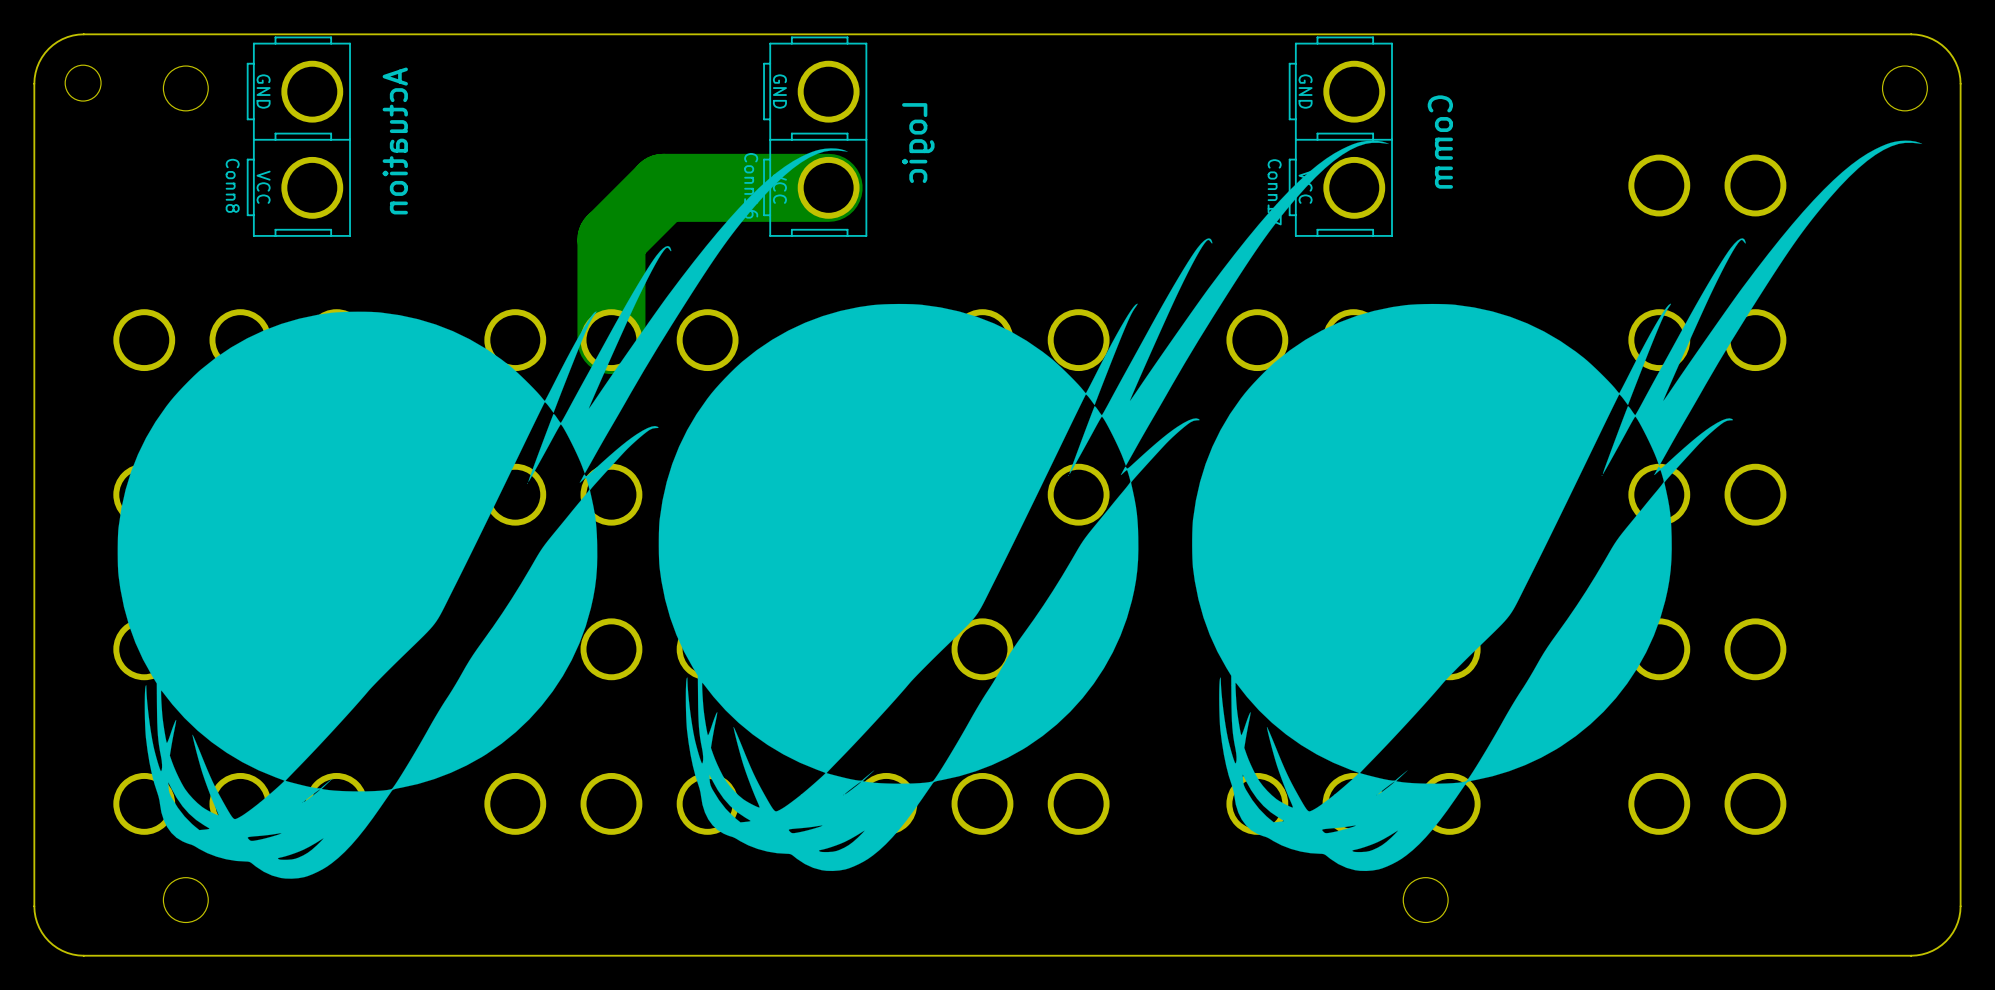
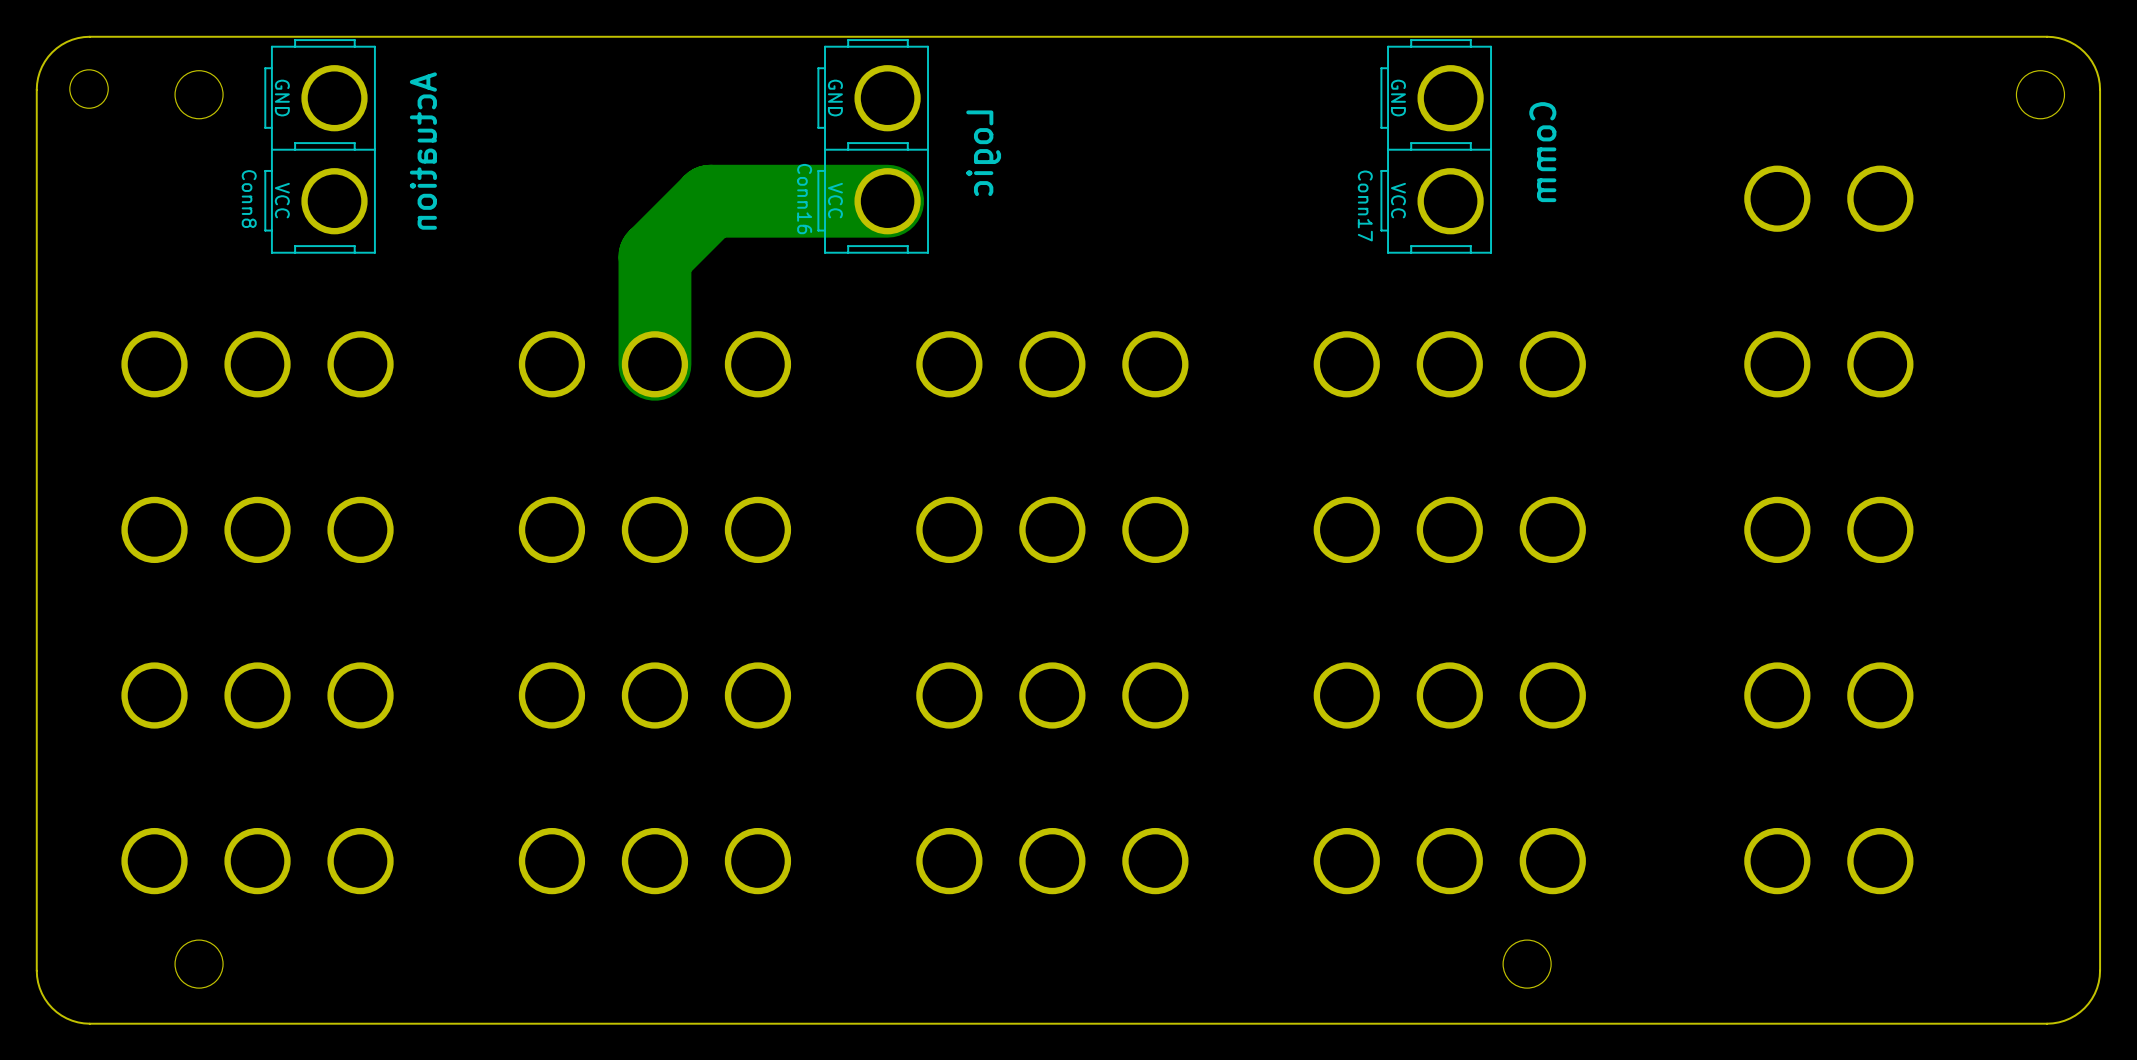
drawing: [117, 140, 1923, 879] -> none

